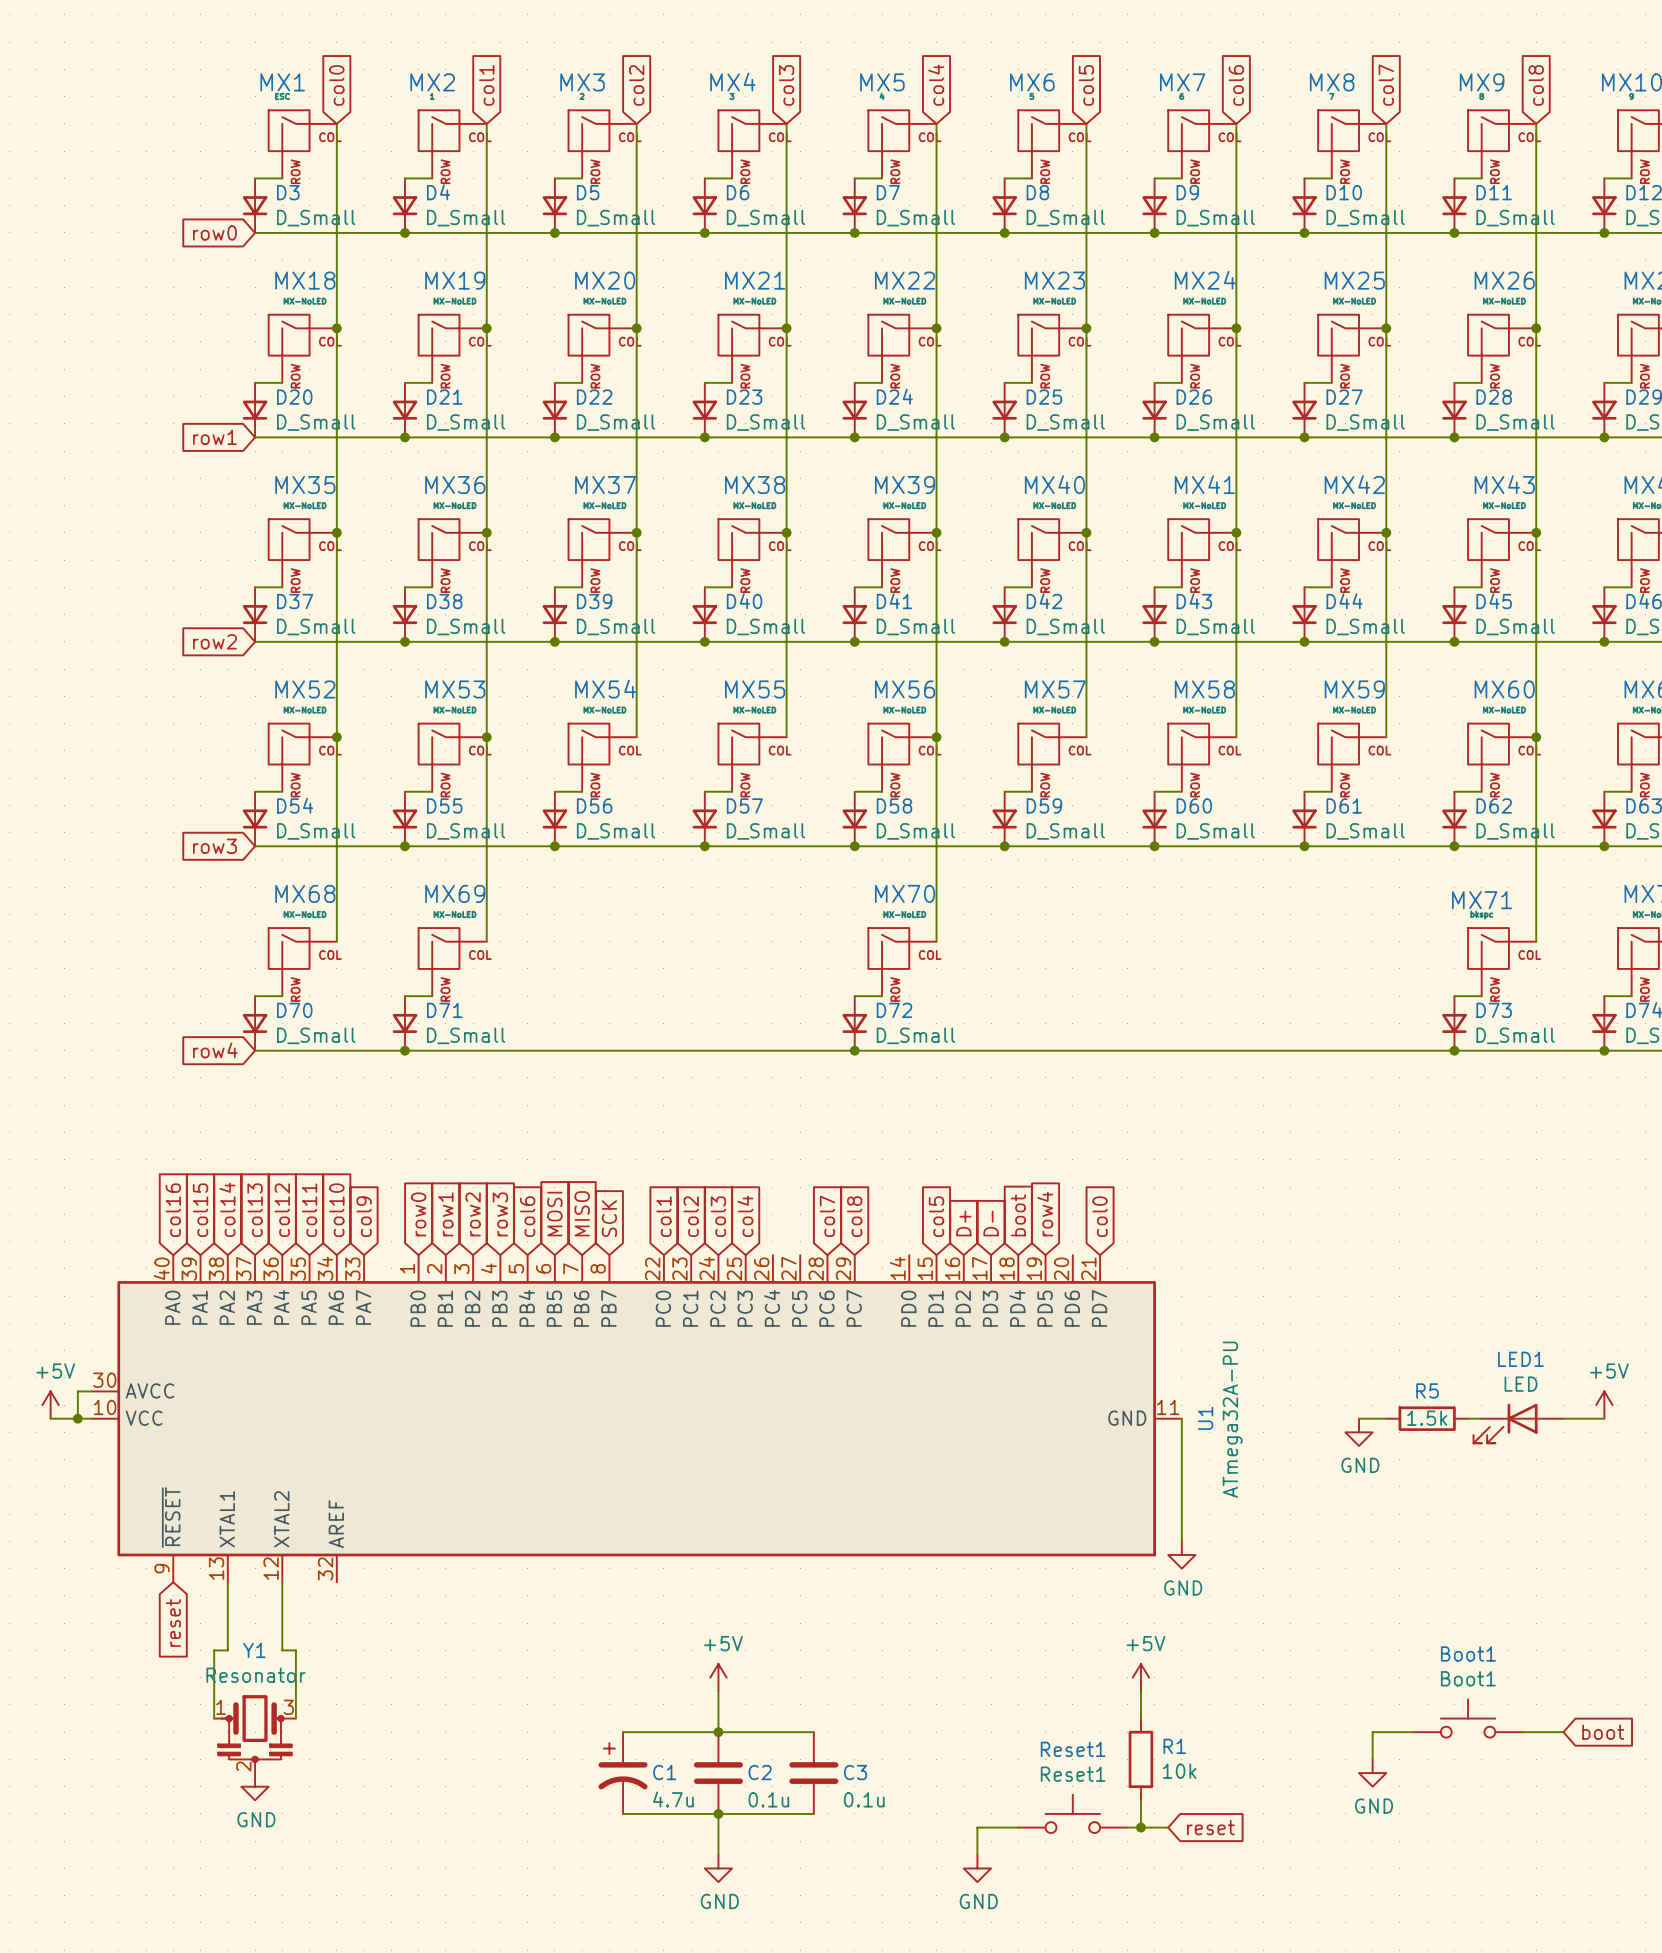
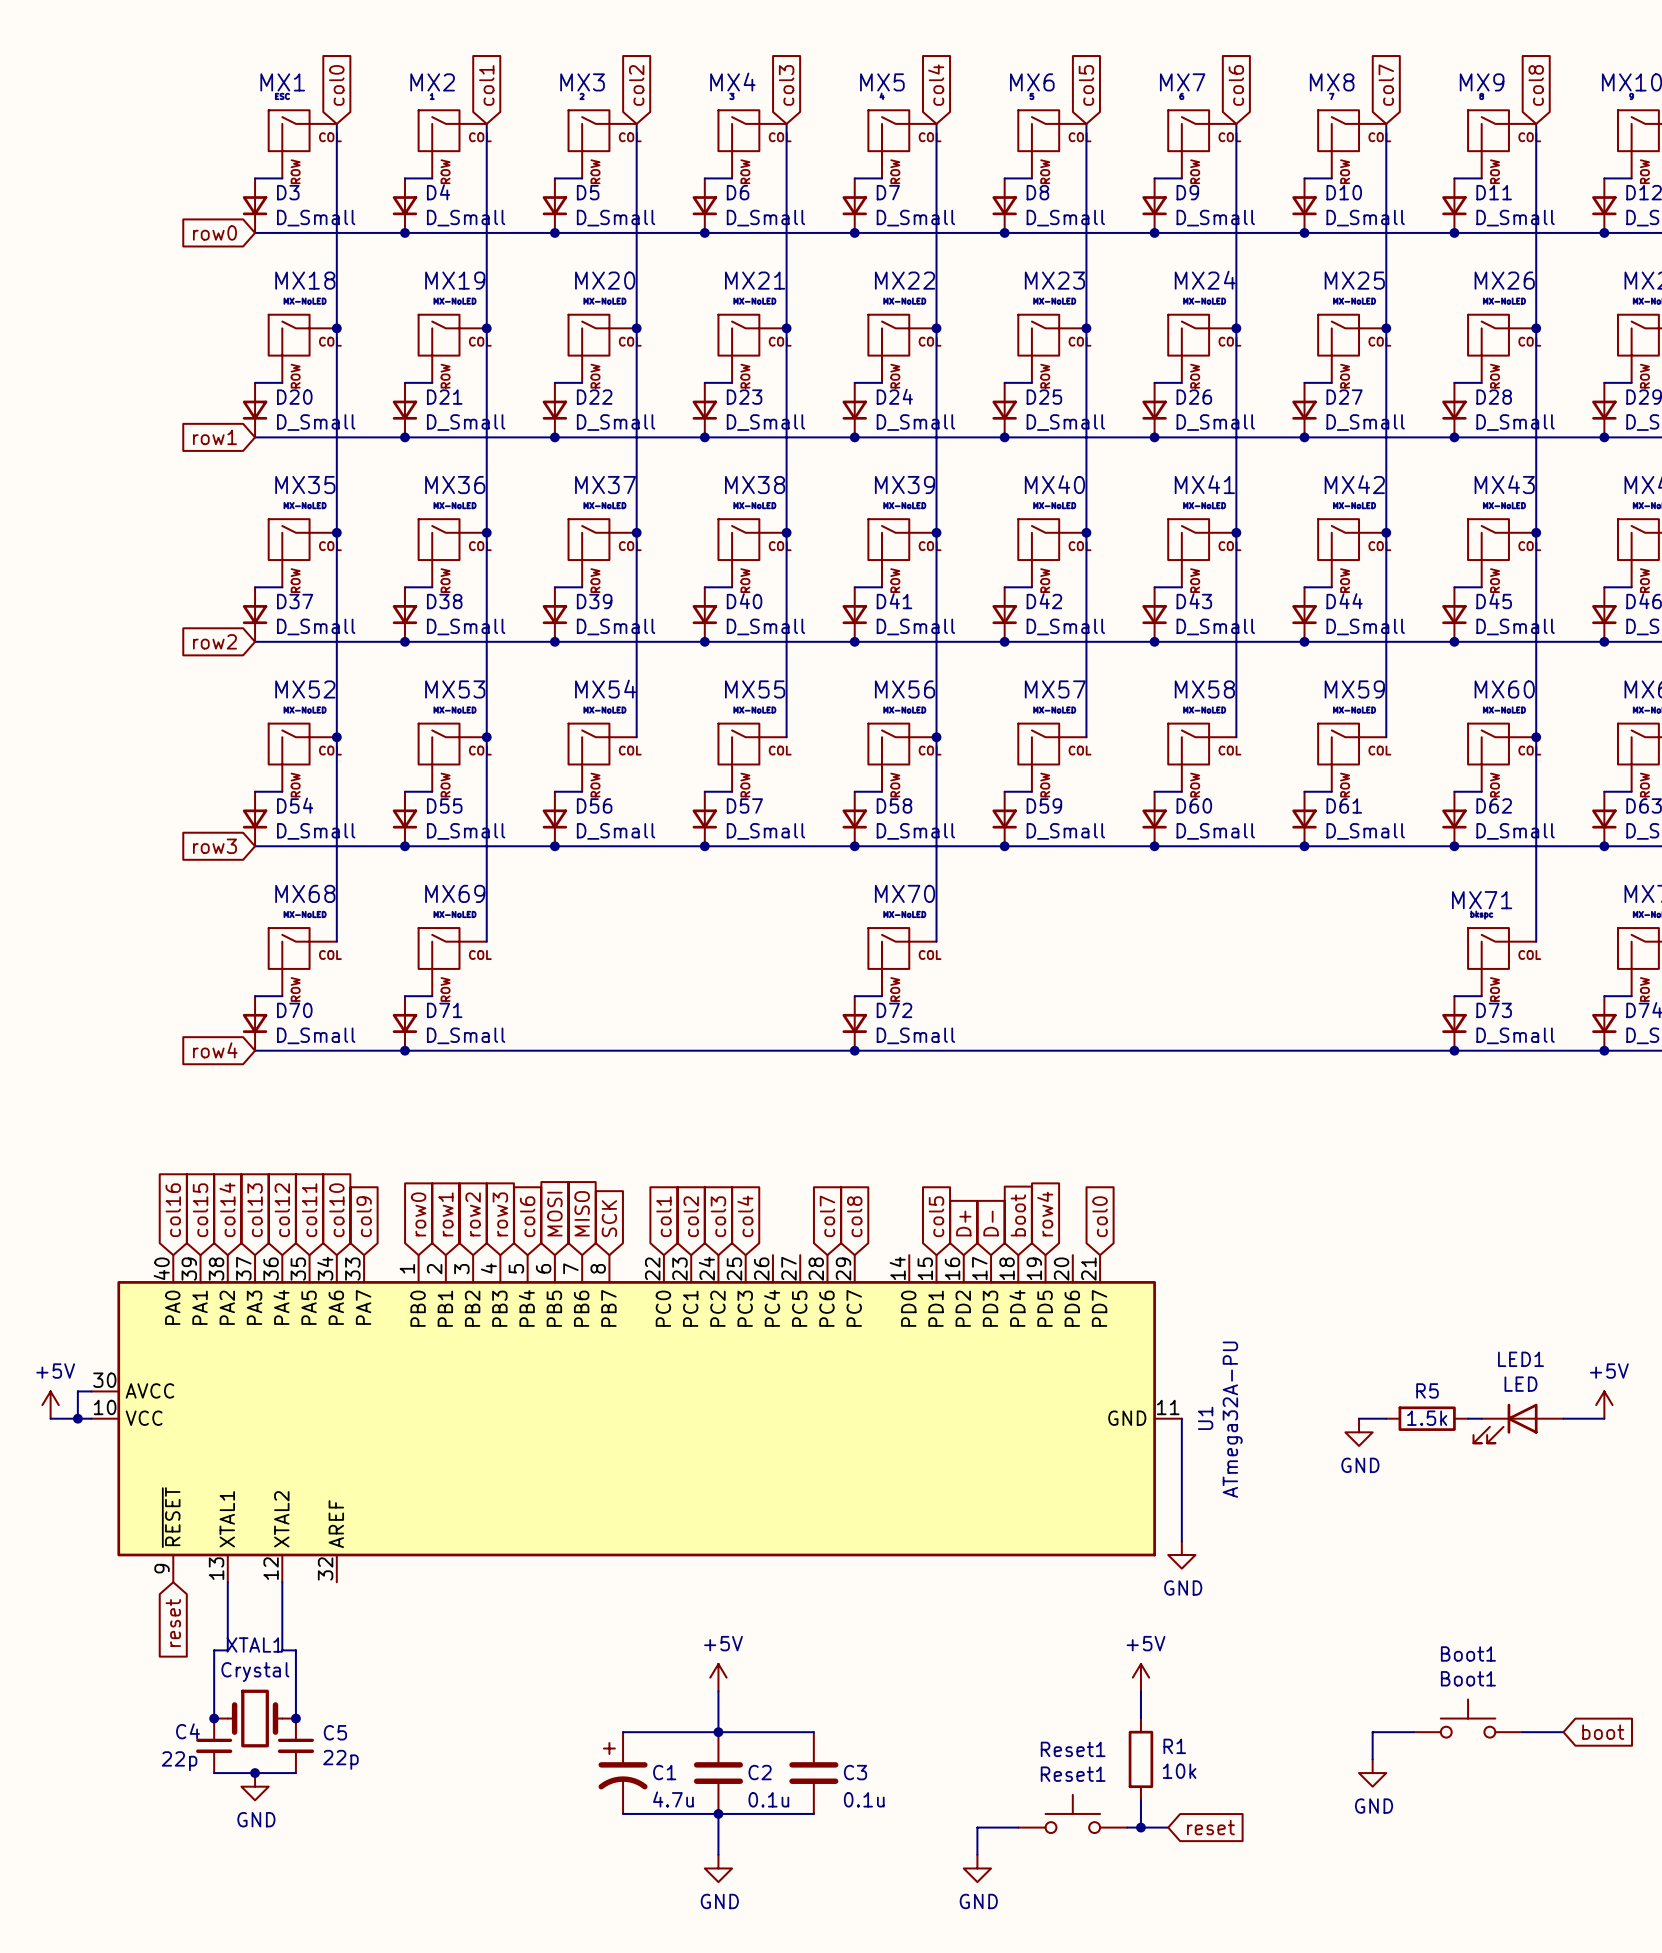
junction: none -> (214, 1718)
XTAL1: none -> Crystal (255, 1718)
junction: none -> (295, 1718)
Y1: Resonator (255, 1734) -> none
C4: none -> 22p (214, 1745)
C5: none -> 22p (295, 1745)
wire: none -> (214, 1773) (295, 1773)
junction: none -> (255, 1773)

